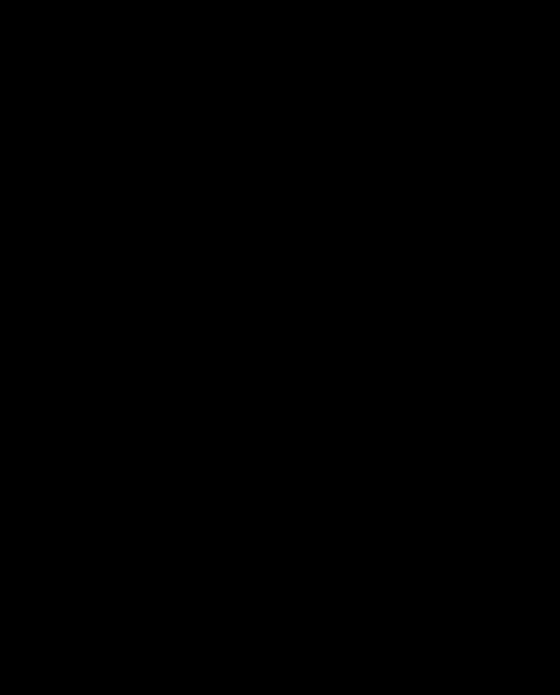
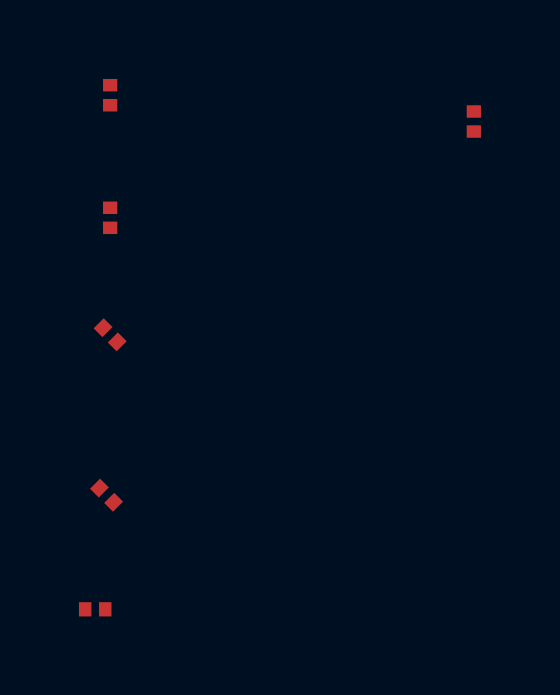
part: none -> (110, 95)
part: none -> (473, 121)
part: none -> (110, 217)
part: none -> (110, 334)
part: none -> (106, 495)
part: none -> (95, 609)

